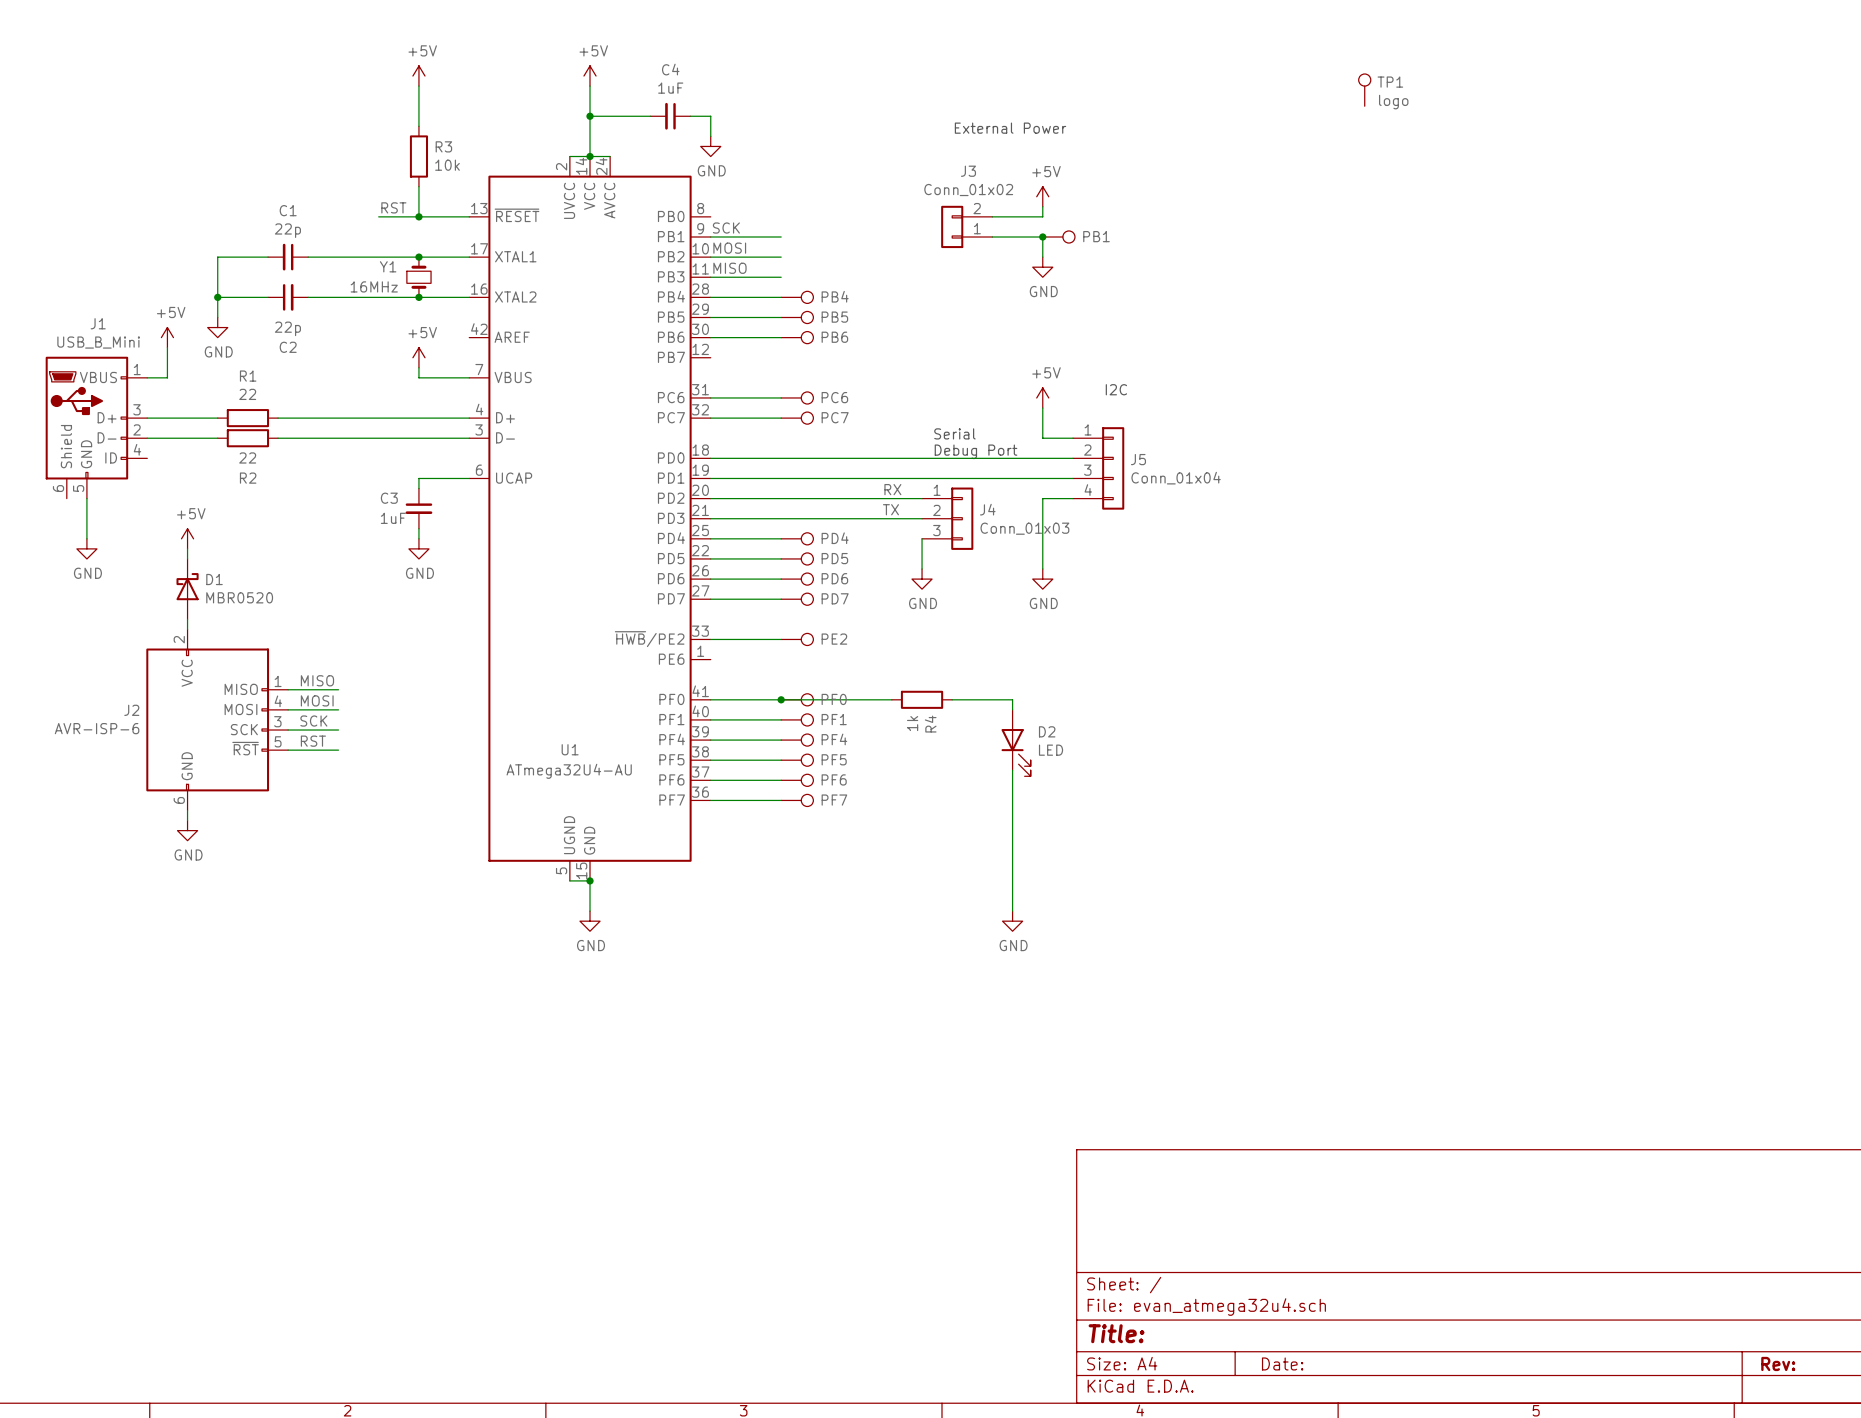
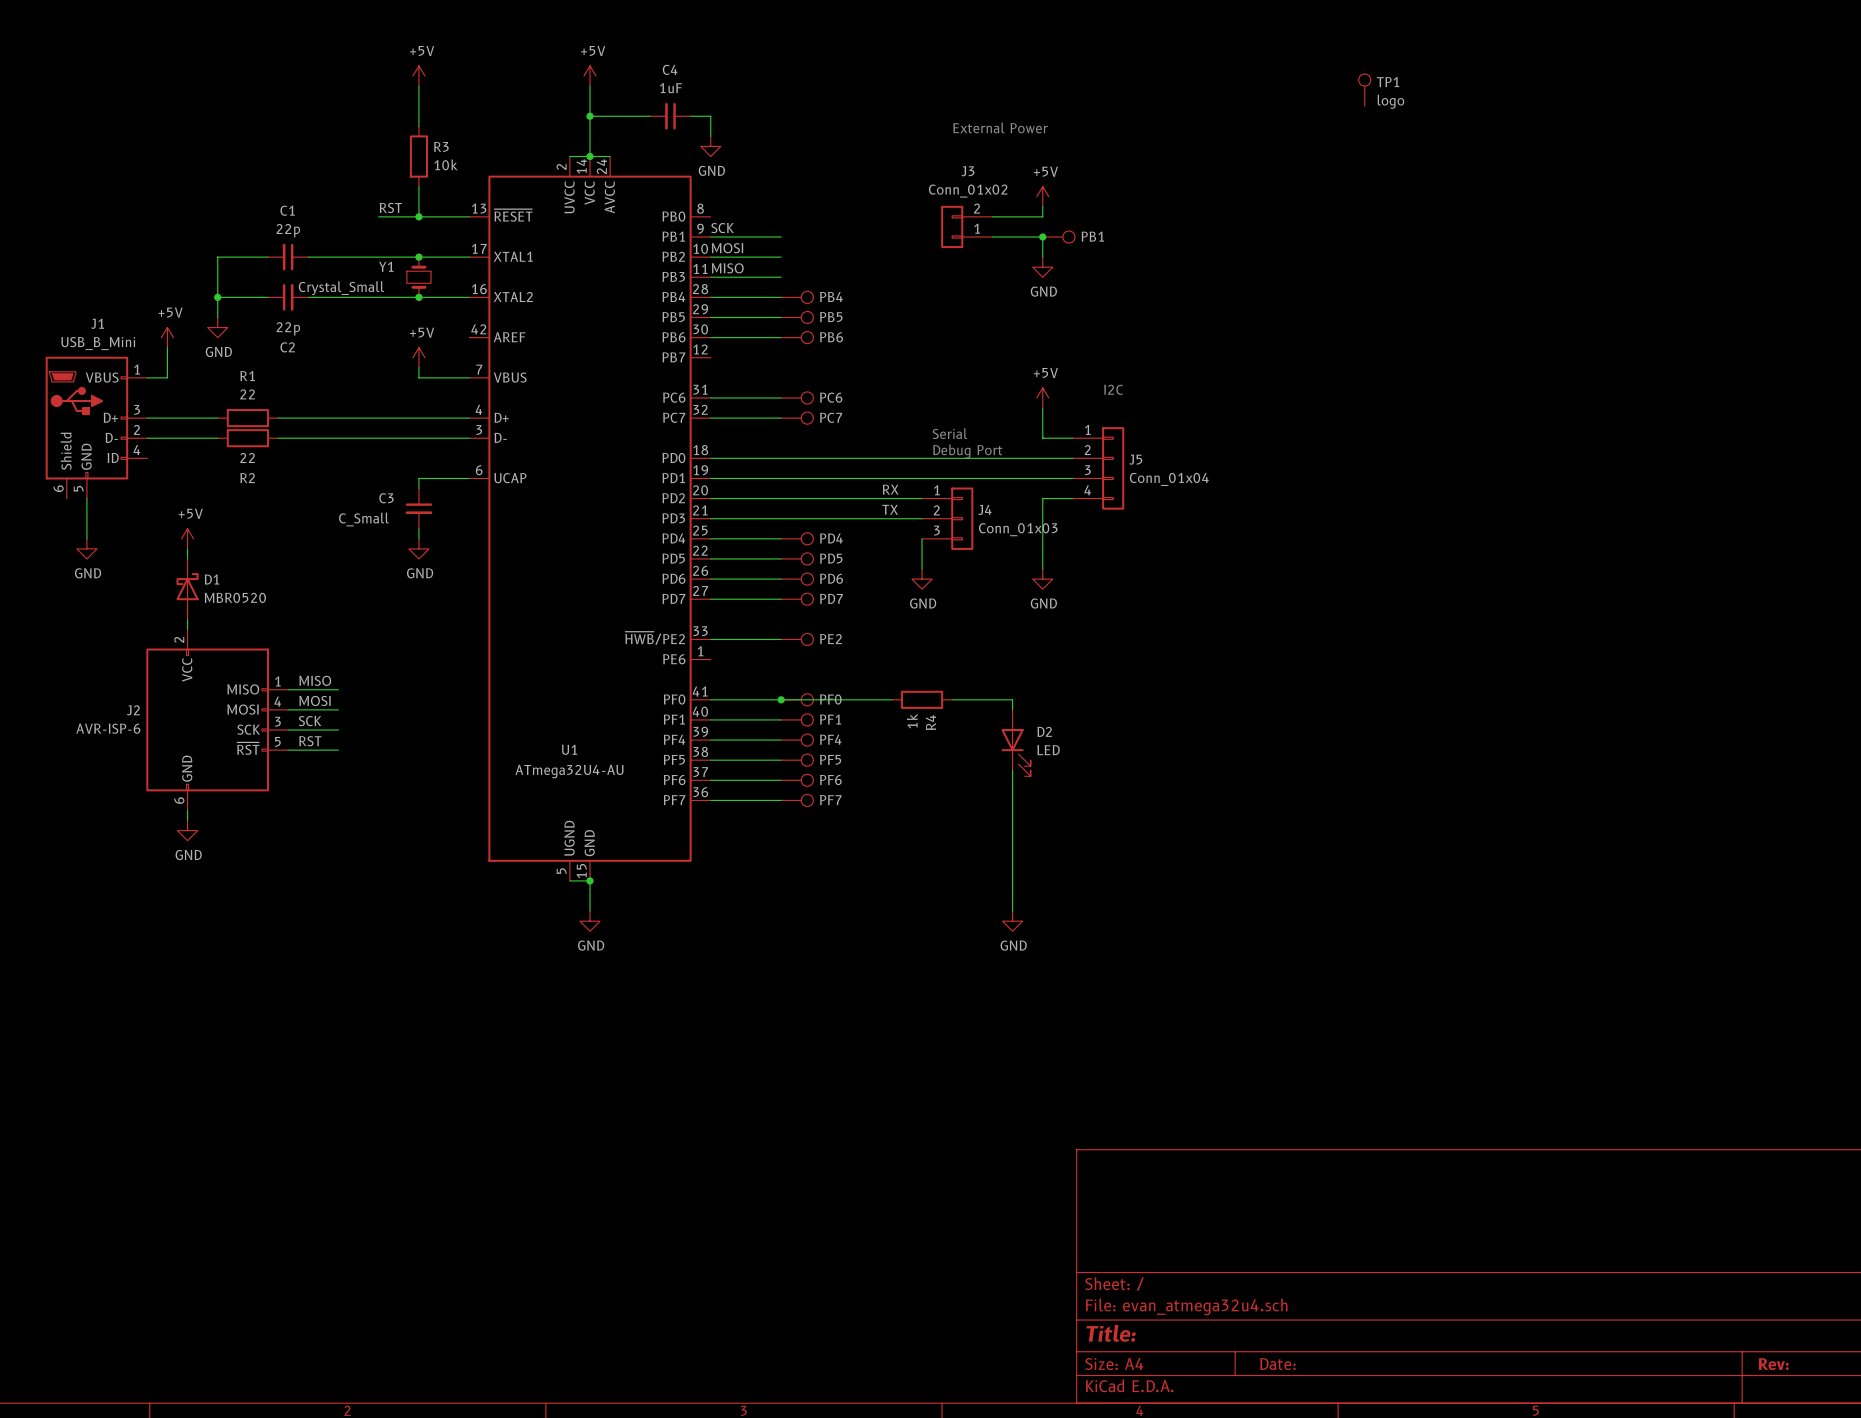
Y1 value: 16MHz (374, 286) -> Crystal_Small (341, 288)
C3 value: 1uF (393, 518) -> C_Small (363, 519)

